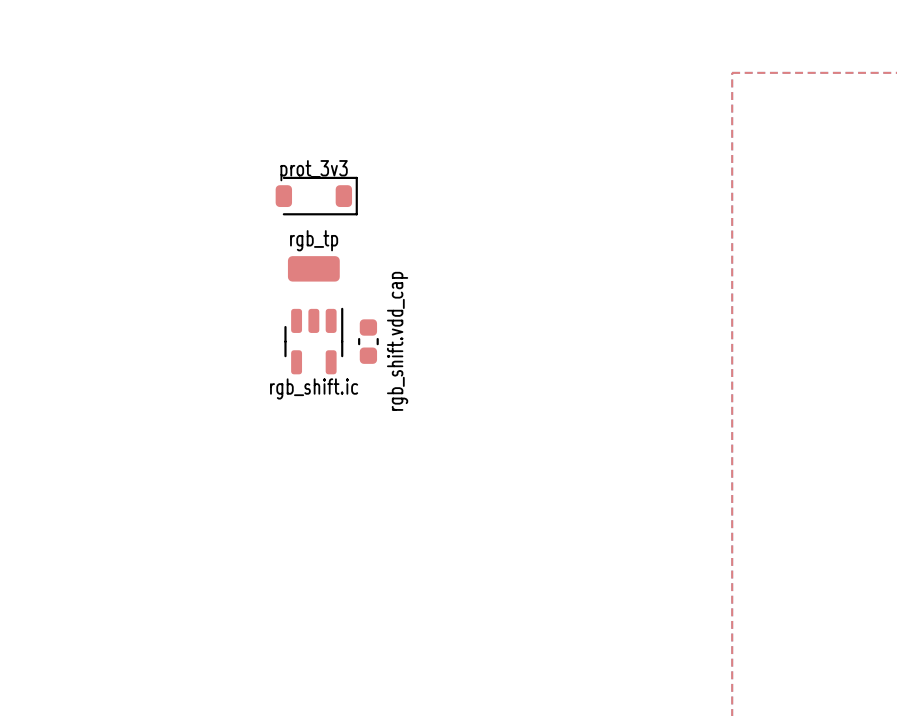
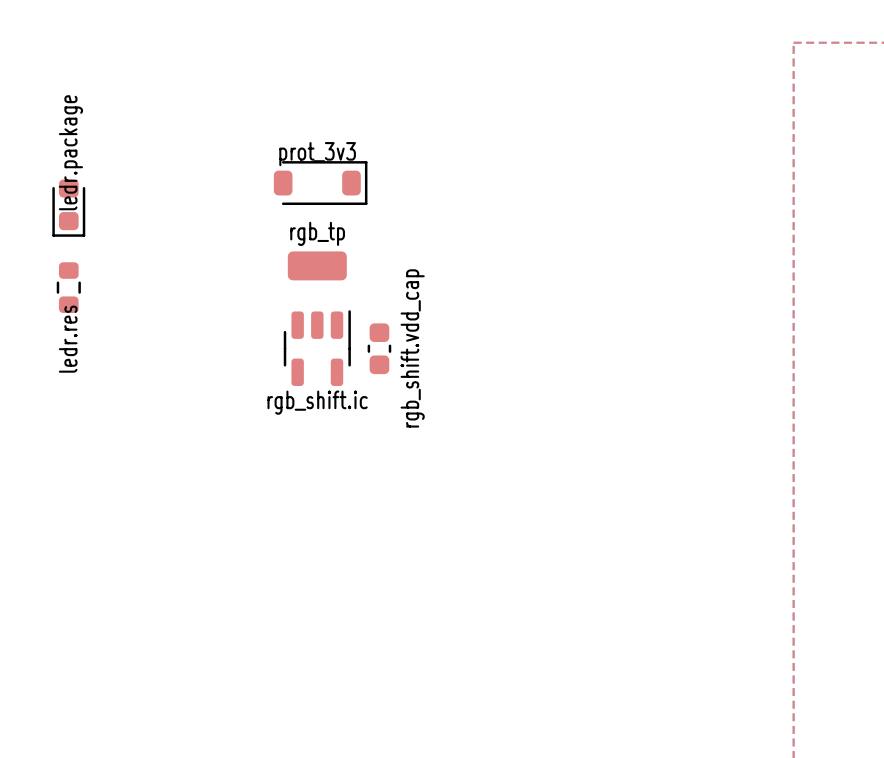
ledr.package: none -> (68, 208)
ledr.res: none -> (68, 287)

